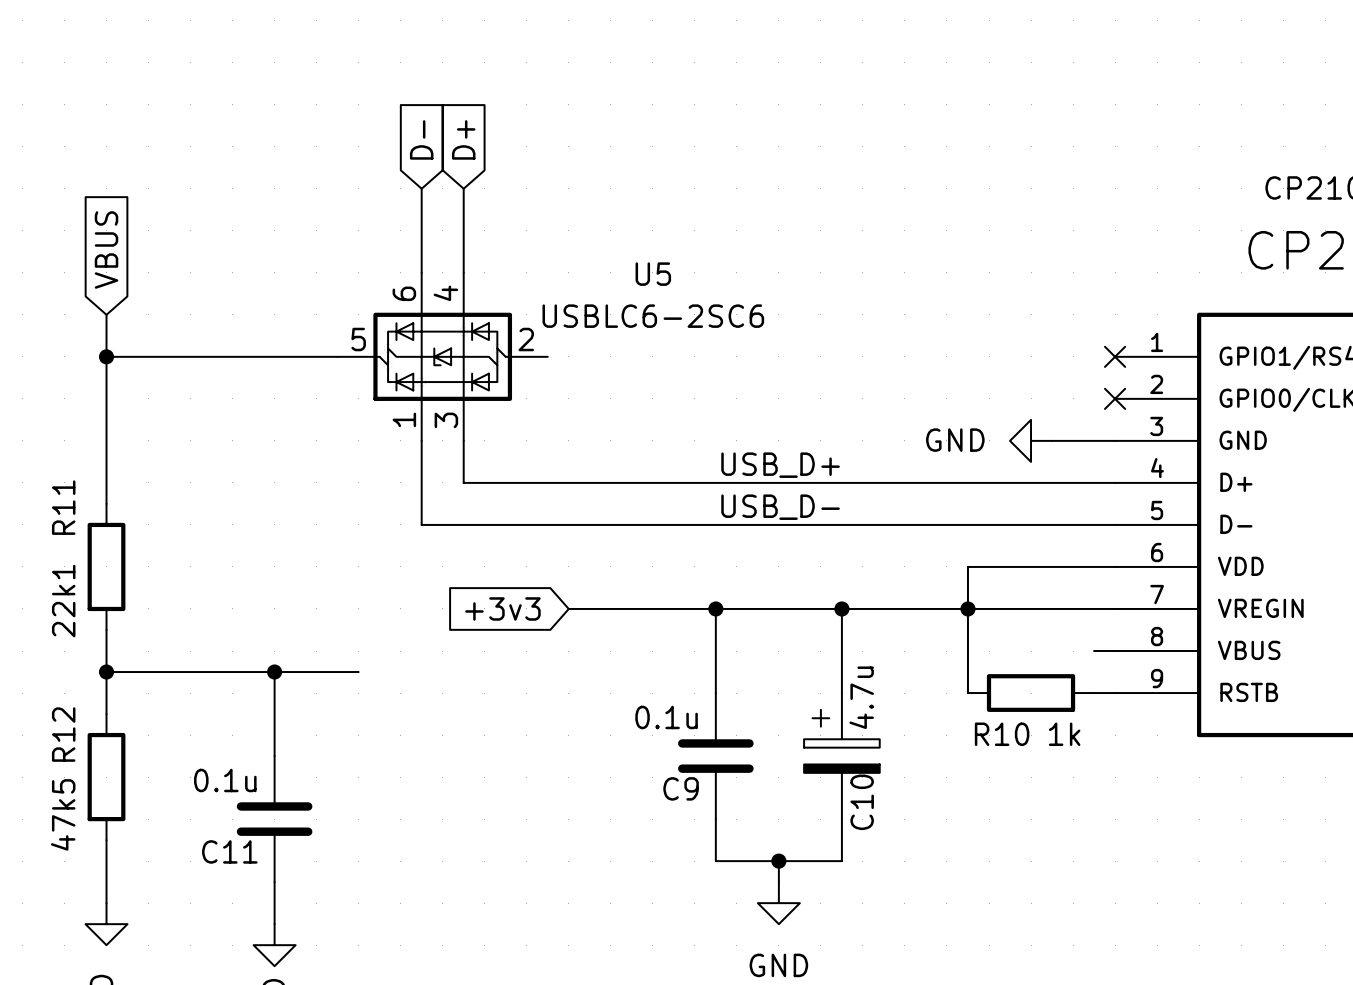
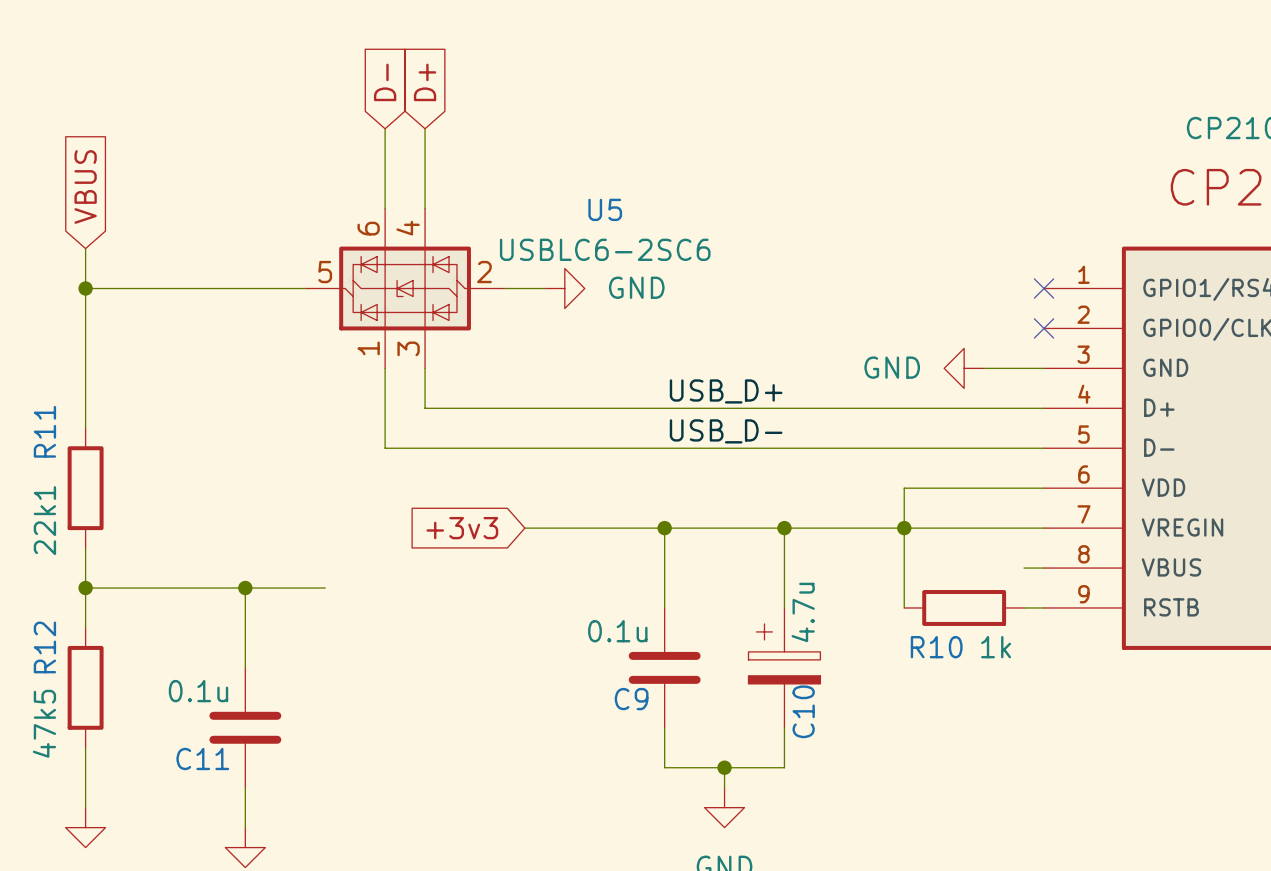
wire: none -> (504, 288) (544, 288)
power symbol: none -> GND (564, 288)

